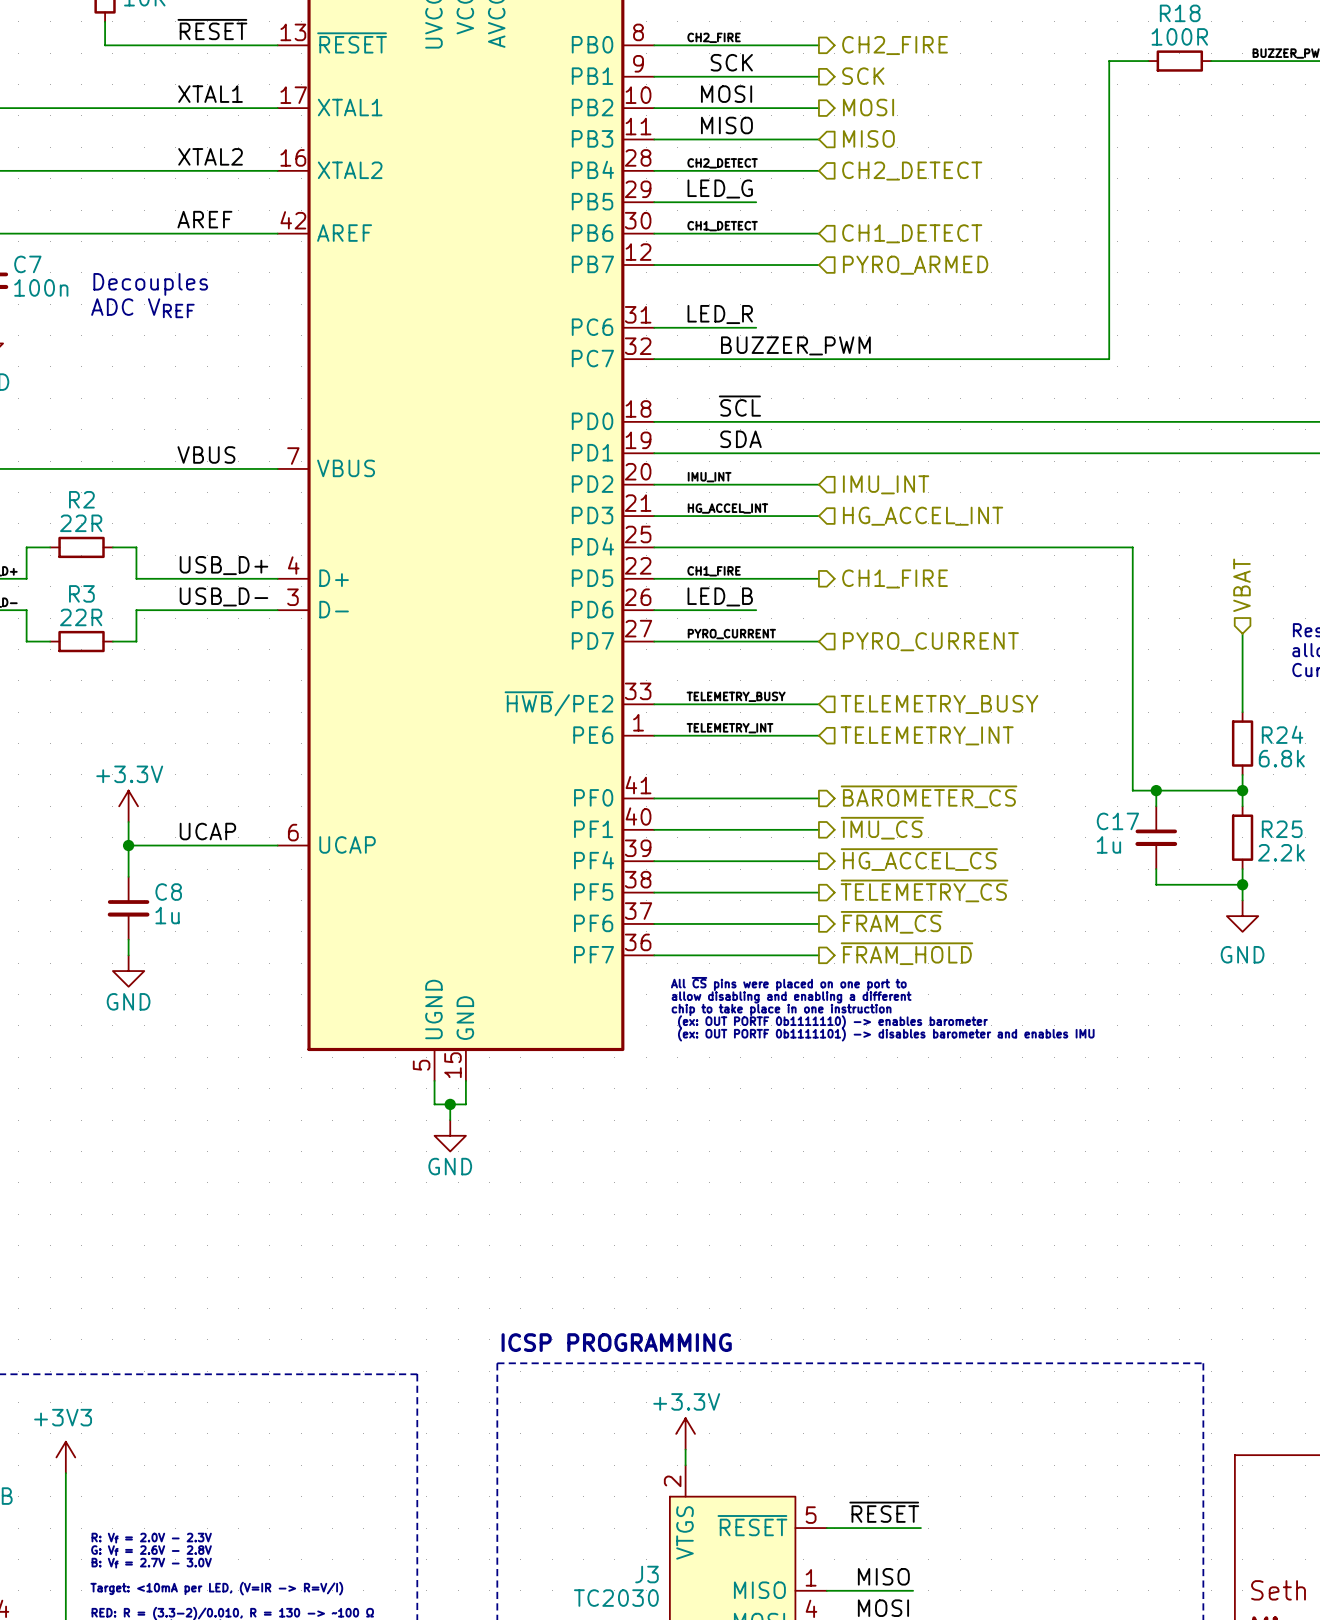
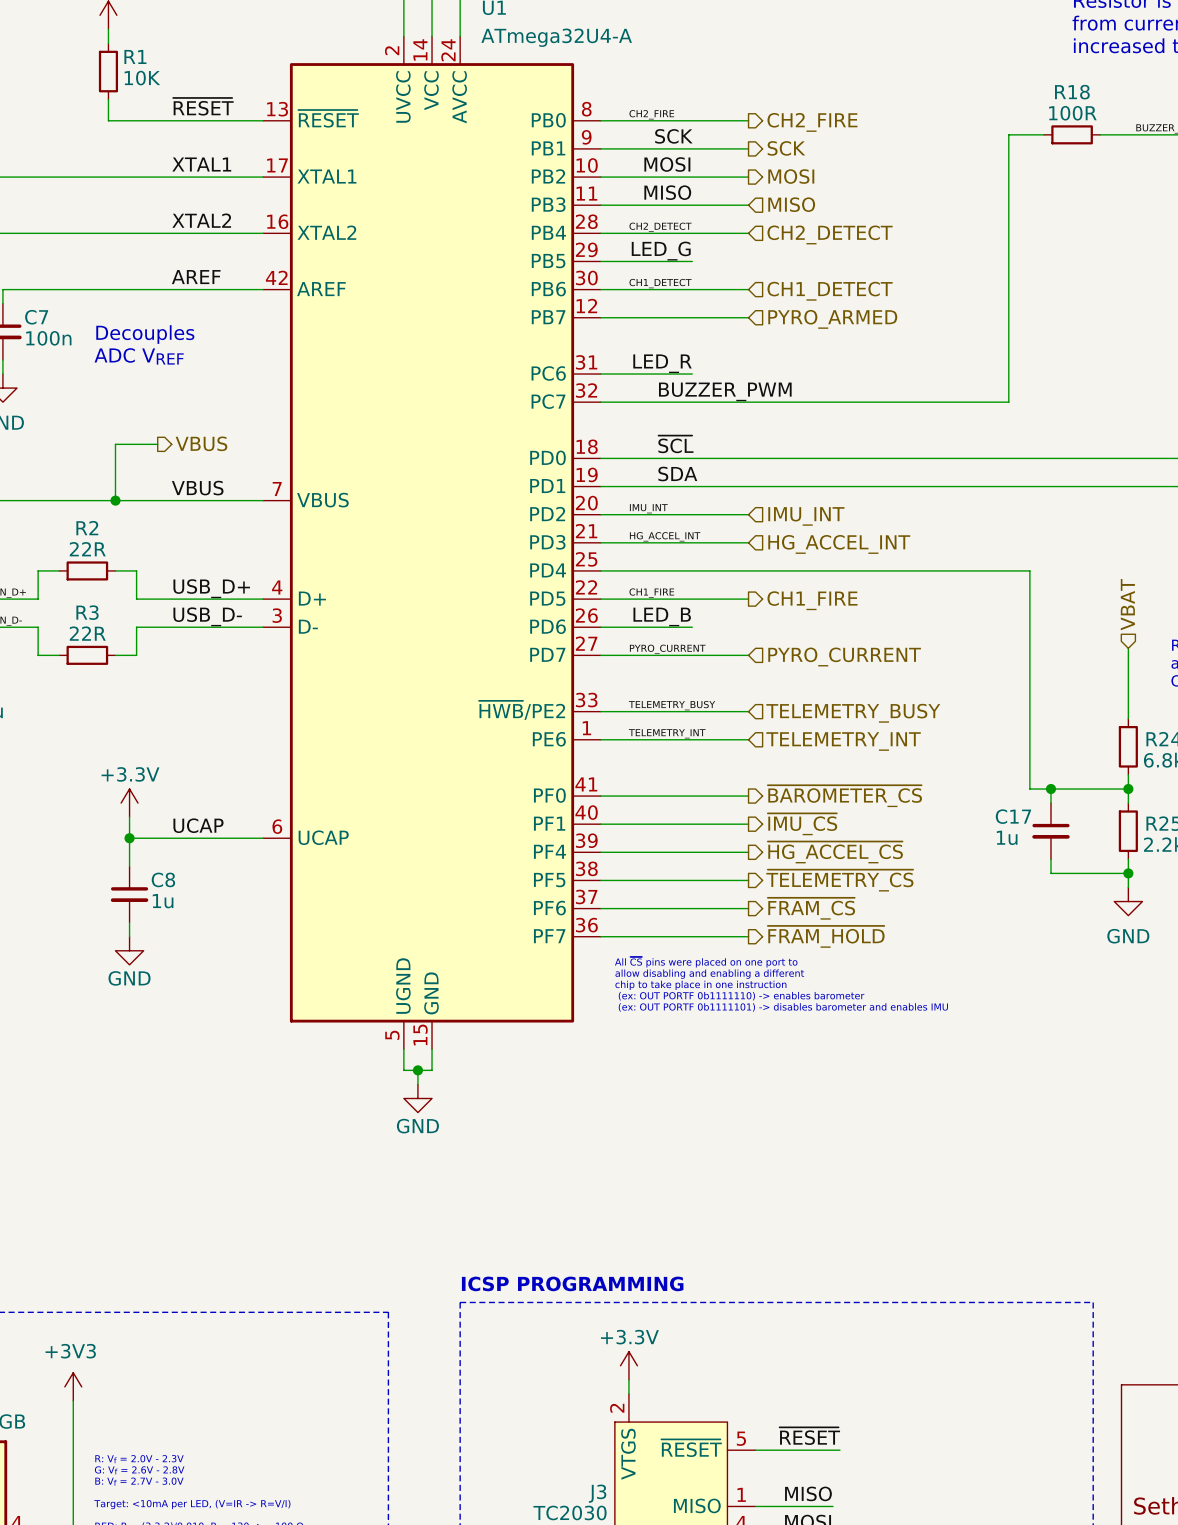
hierarchical label: none -> VBUS (201, 443)
wire: none -> (157, 444) (115, 444) (115, 500)
junction: none -> (115, 500)

